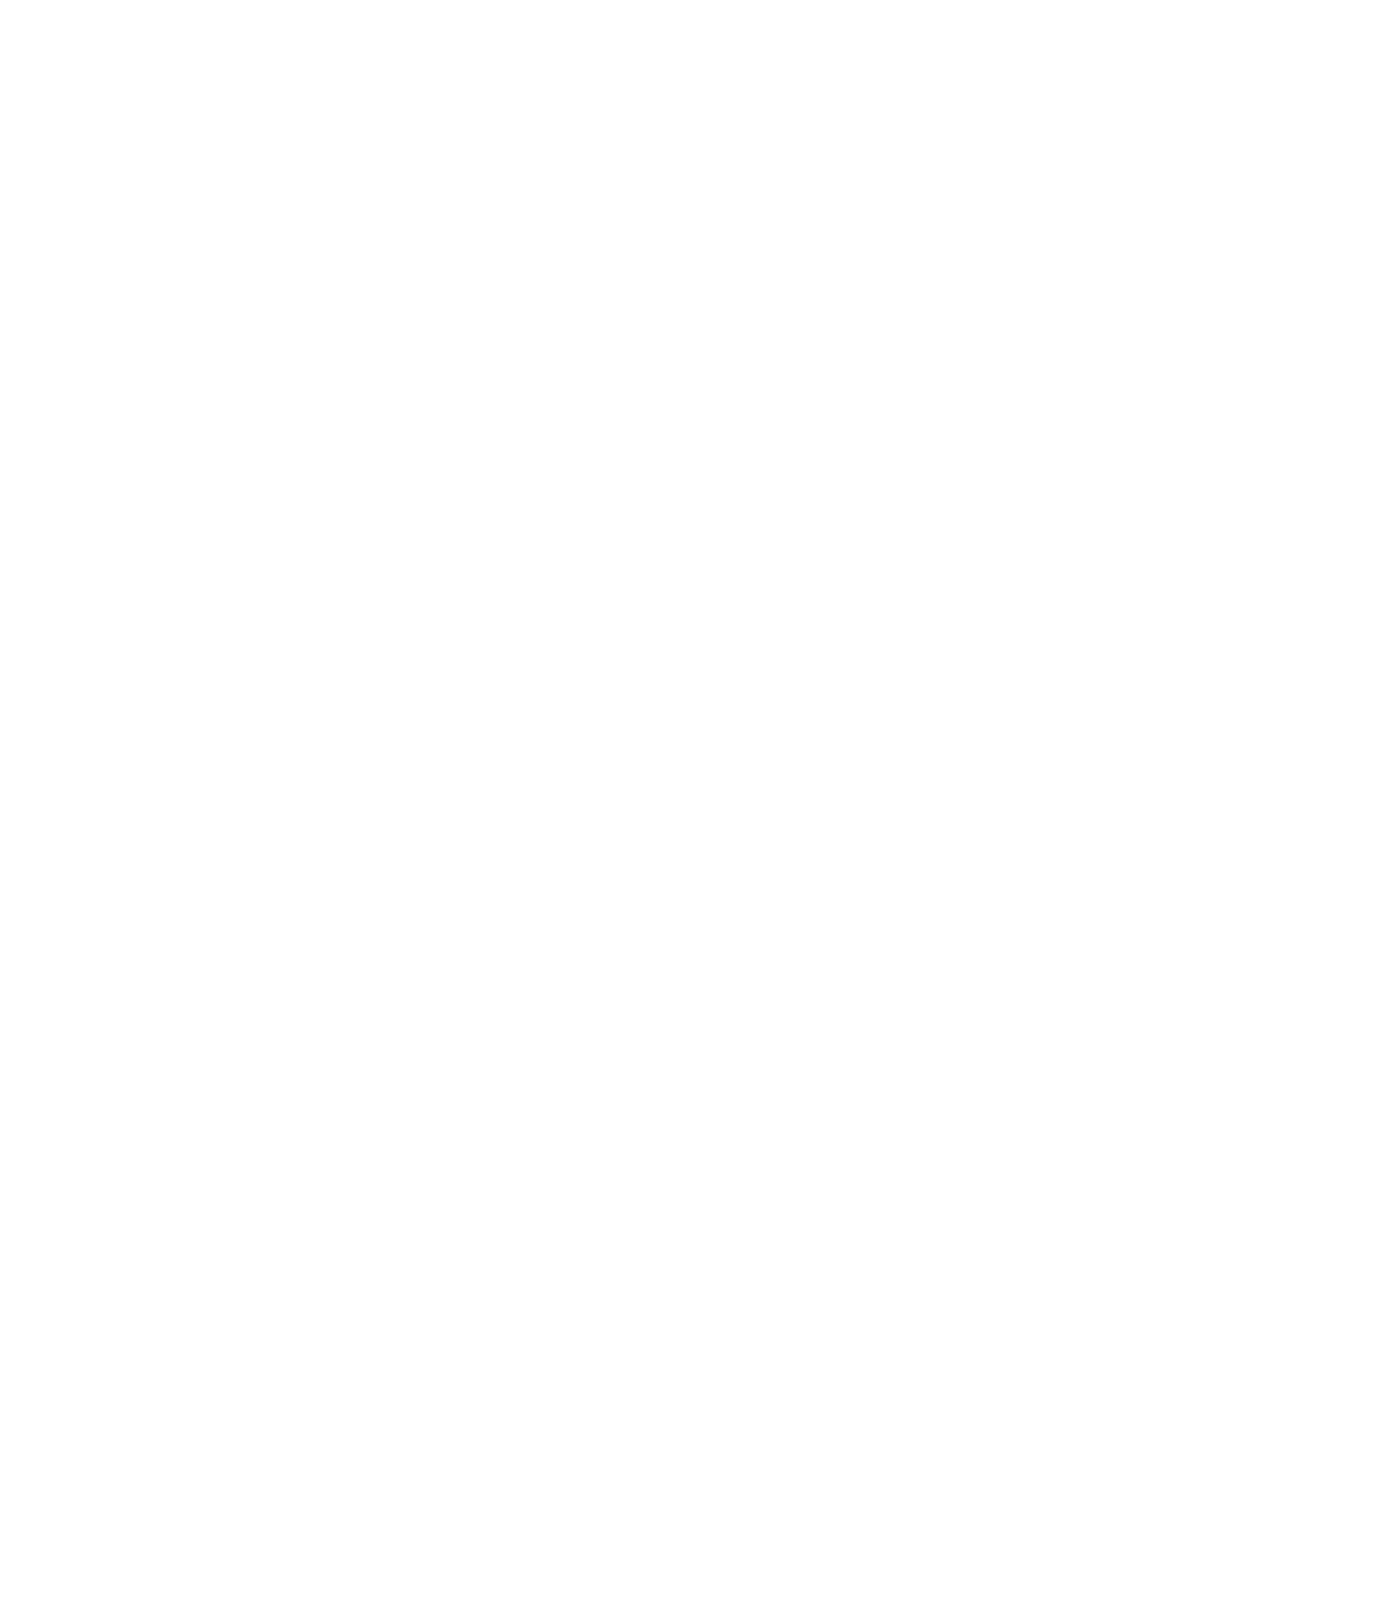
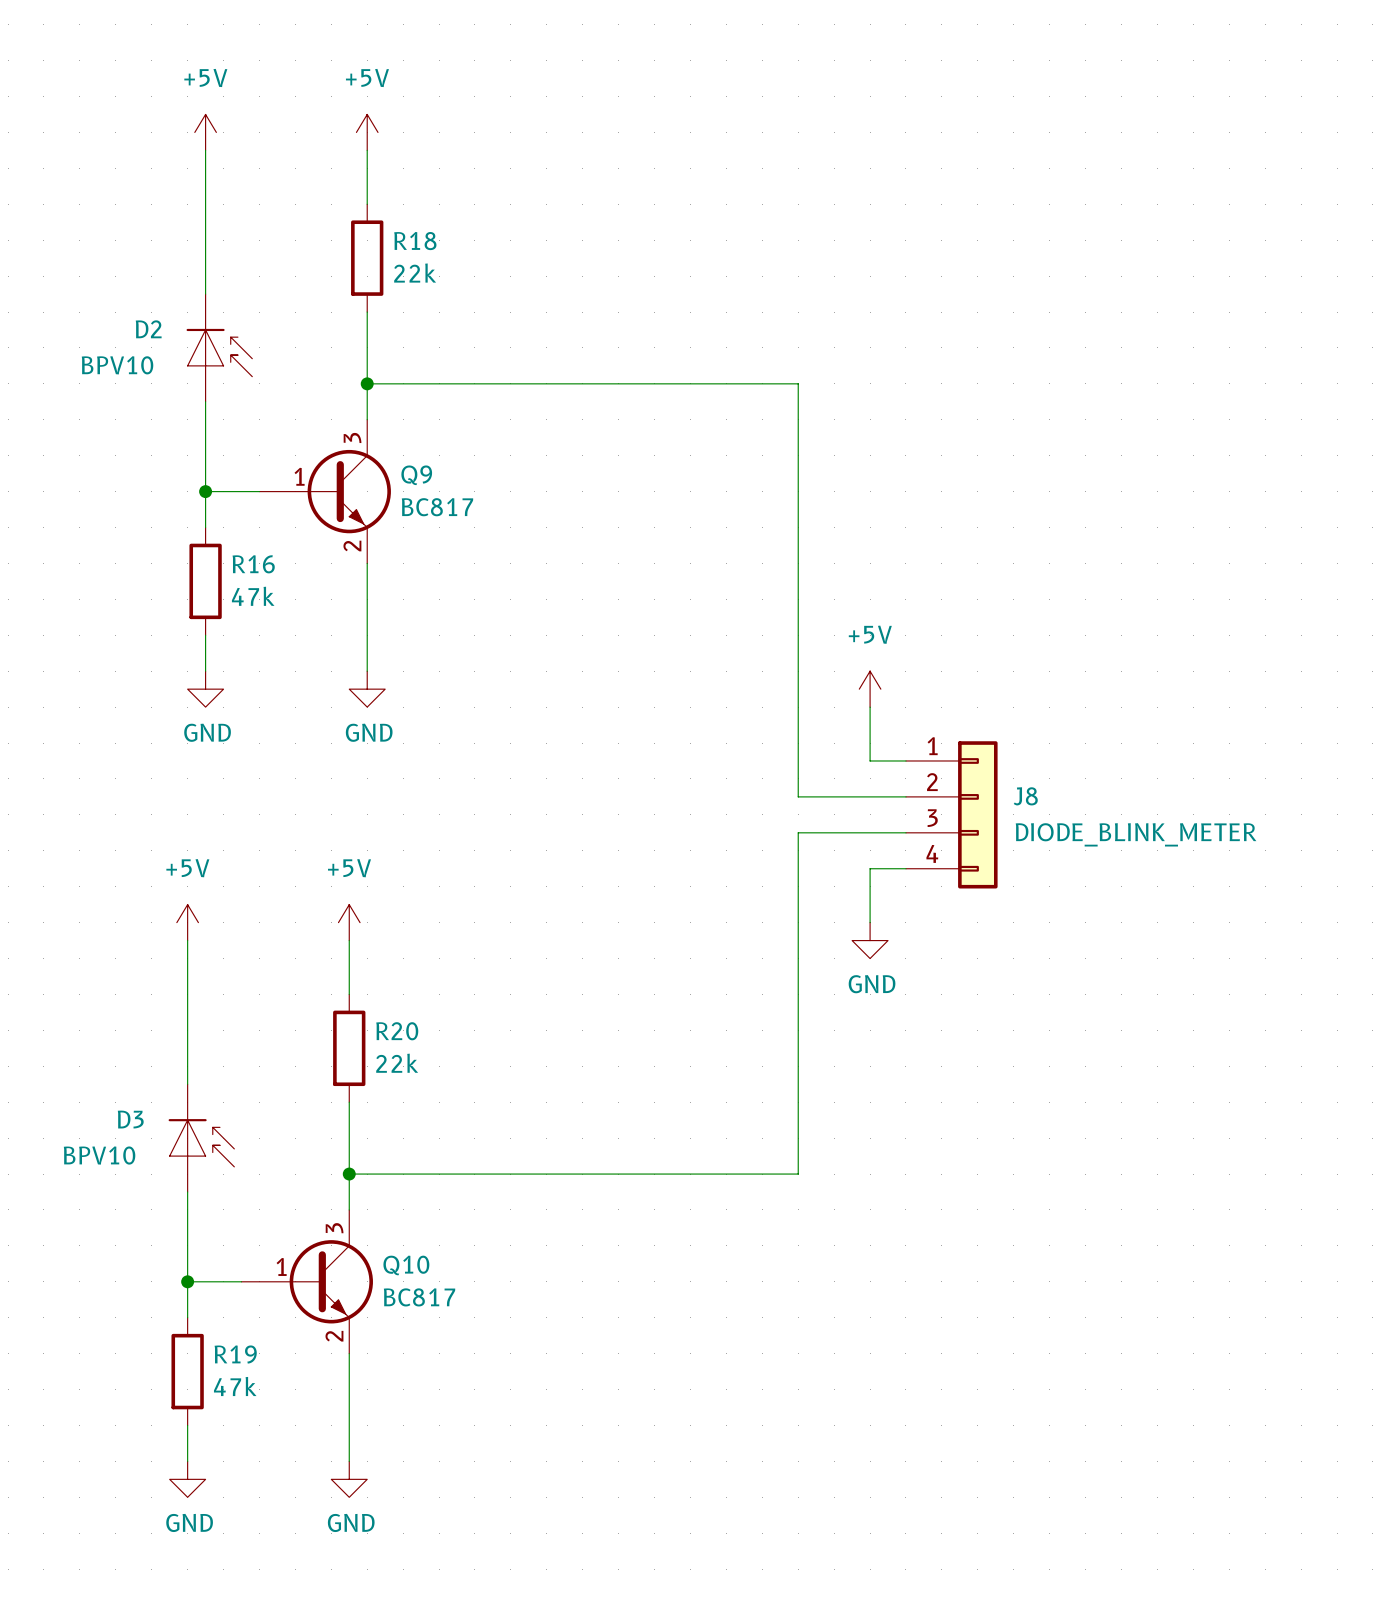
power symbol: none -> +5V (205, 132)
power symbol: none -> +5V (367, 132)
wire: none -> (205, 150) (205, 294)
wire: none -> (367, 150) (367, 204)
R18: none -> 22k (367, 258)
wire: none -> (367, 312) (367, 419)
D2: none -> BPV10 (219, 347)
wire: none -> (367, 383) (798, 383) (798, 796) (905, 796)
junction: none -> (367, 383)
wire: none -> (205, 401) (205, 527)
wire: none -> (205, 491) (259, 491)
junction: none -> (205, 491)
Q9: none -> BC817 (325, 491)
wire: none -> (367, 563) (367, 671)
R16: none -> 47k (205, 581)
wire: none -> (205, 635) (205, 671)
power symbol: none -> GND (205, 689)
power symbol: none -> GND (367, 689)
power symbol: none -> +5V (870, 689)
wire: none -> (870, 707) (870, 760) (905, 760)
J8: none -> DIODE_BLINK_METER (951, 814)
wire: none -> (905, 832) (798, 832) (798, 1174) (349, 1174)
wire: none -> (905, 868) (870, 868) (870, 922)
power symbol: none -> +5V (187, 922)
power symbol: none -> +5V (349, 922)
wire: none -> (187, 940) (187, 1084)
wire: none -> (349, 940) (349, 994)
power symbol: none -> GND (870, 940)
R20: none -> 22k (349, 1048)
wire: none -> (349, 1102) (349, 1209)
D3: none -> BPV10 (201, 1138)
junction: none -> (349, 1174)
wire: none -> (187, 1192) (187, 1317)
wire: none -> (187, 1281) (241, 1281)
junction: none -> (187, 1281)
Q10: none -> BC817 (307, 1281)
wire: none -> (349, 1353) (349, 1461)
R19: none -> 47k (187, 1371)
wire: none -> (187, 1425) (187, 1461)
power symbol: none -> GND (187, 1479)
power symbol: none -> GND (349, 1479)

